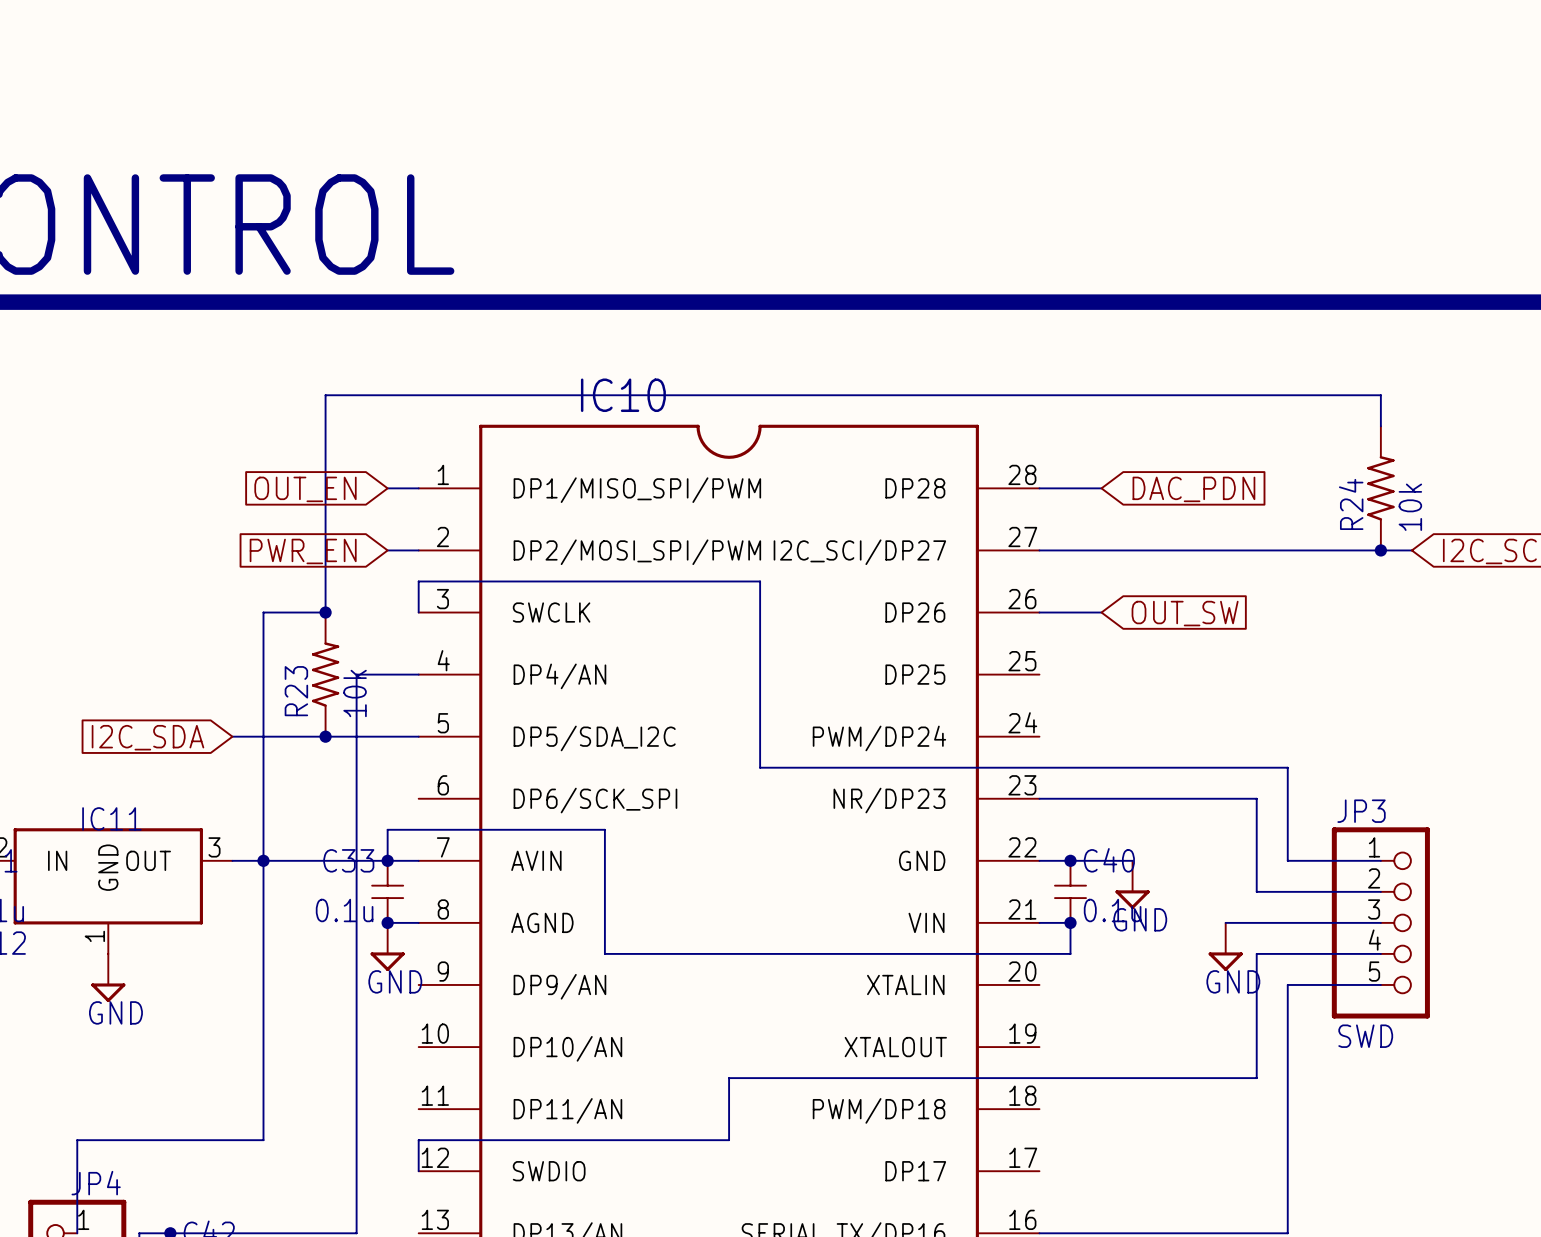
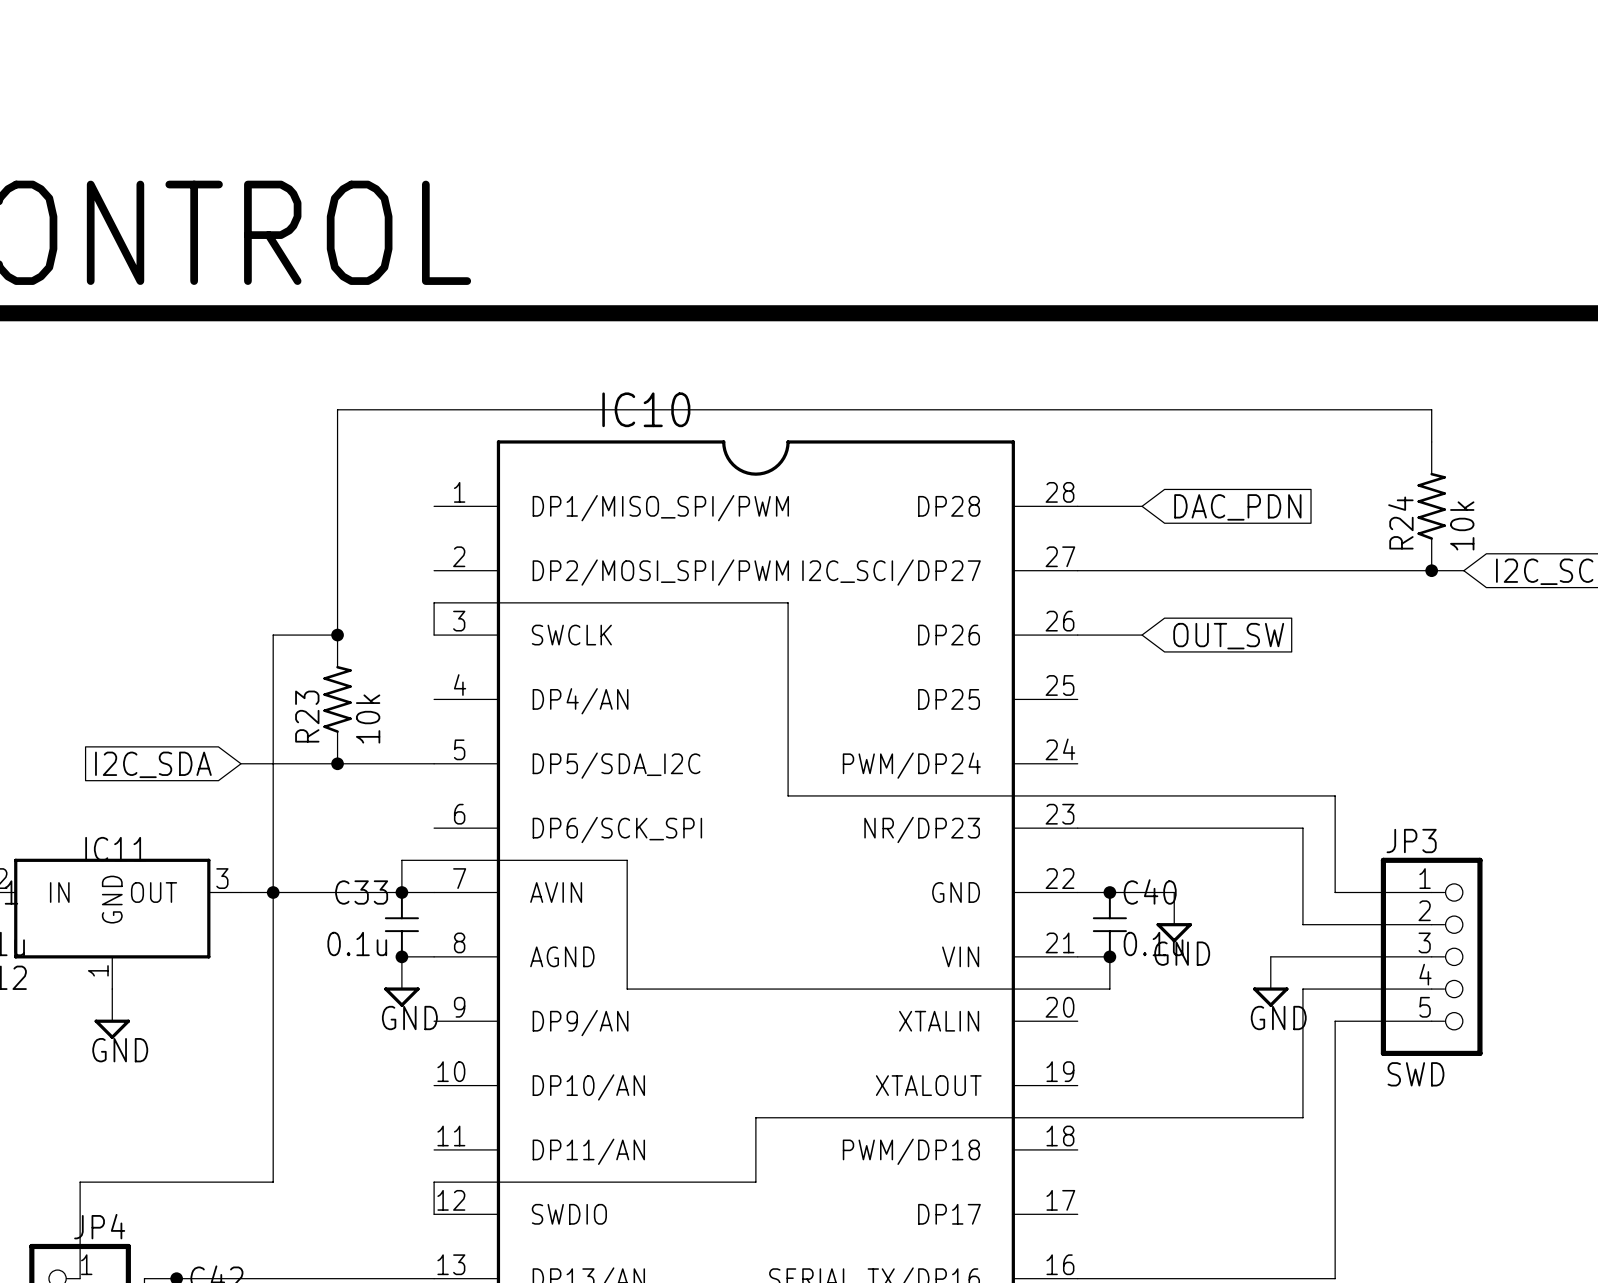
wire: (387, 488) (418, 488) -> none
global label: OUT_EN (305, 489) -> none
wire: (387, 550) (418, 550) -> none
global label: PWR_EN (303, 551) -> none
wire: (418, 674) (356, 674) (356, 1233) -> (434, 1278) (369, 1278)

